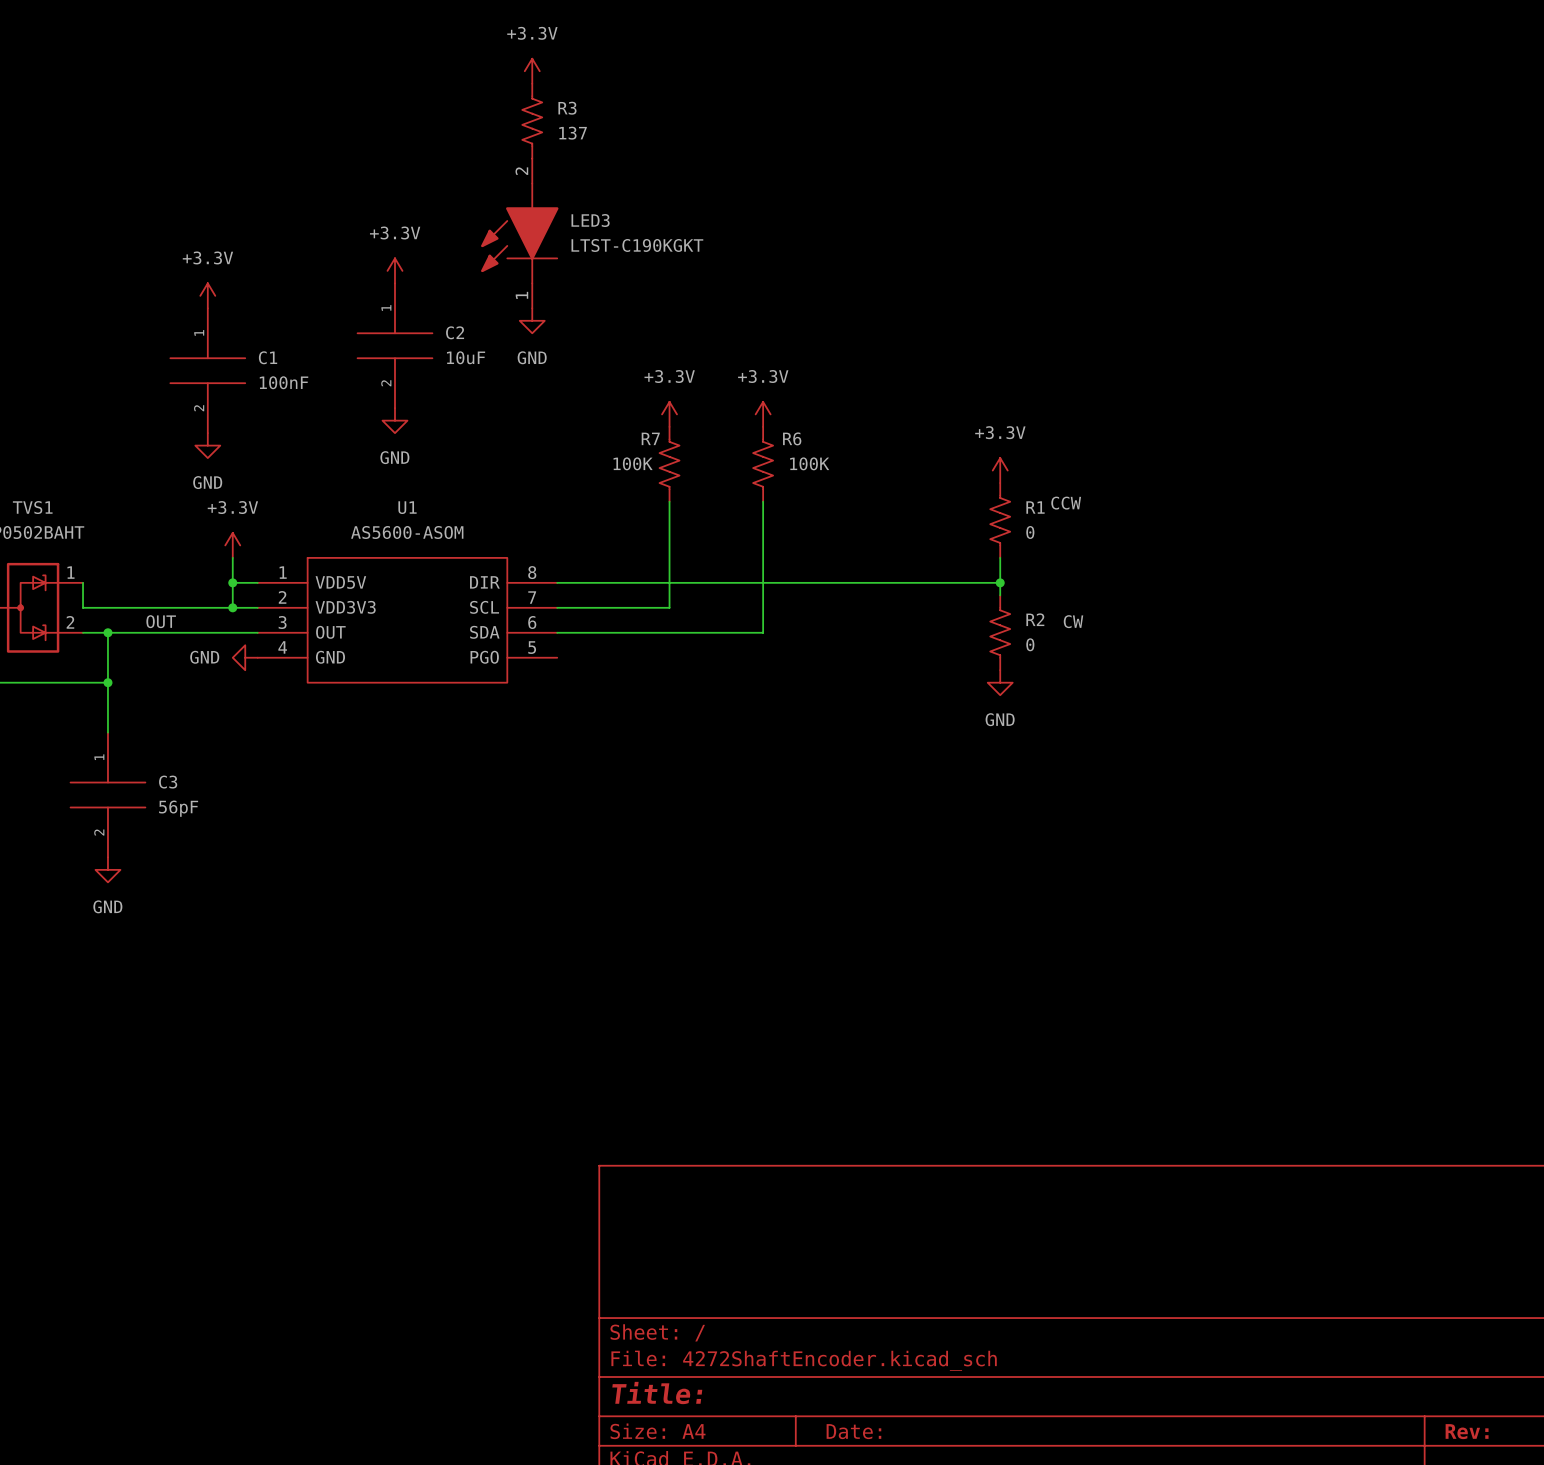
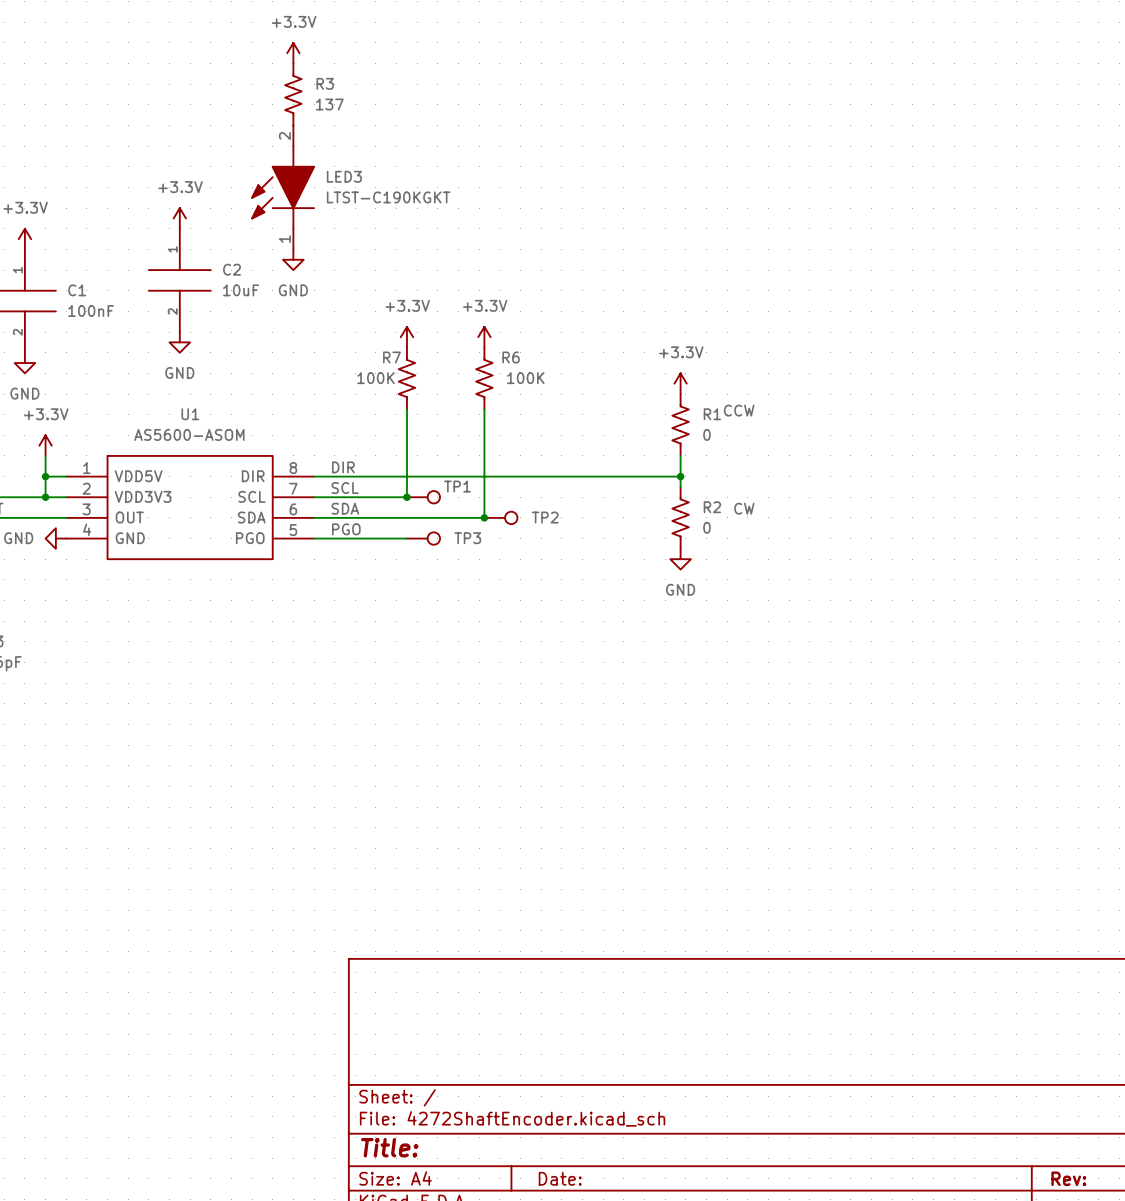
label: none -> DIR (343, 467)
label: none -> SCL (345, 488)
junction: none -> (406, 497)
TP1: none -> (423, 497)
label: none -> SDA (345, 508)
junction: none -> (484, 517)
TP2: none -> (500, 517)
label: none -> PGO (346, 529)
wire: none -> (314, 538) (406, 538)
TP3: none -> (423, 538)

